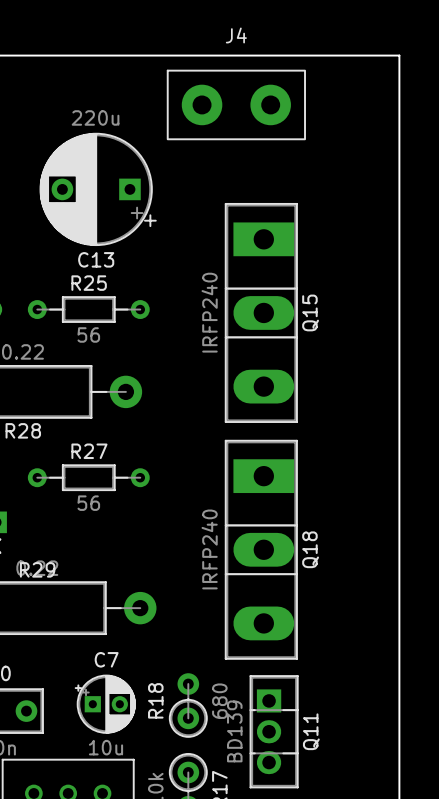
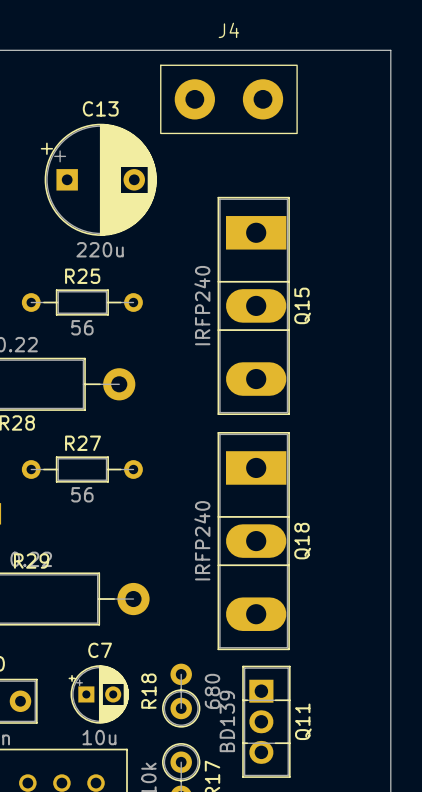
C13 rotation: 0° (98, 189) -> 180° (98, 179)

